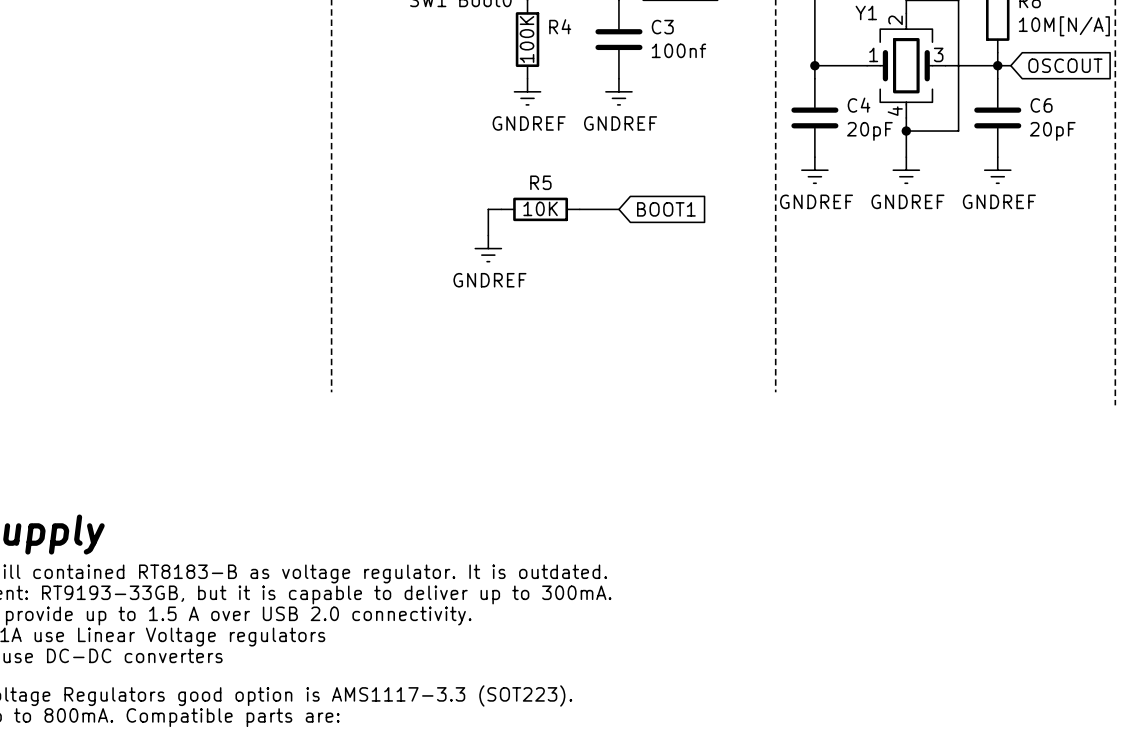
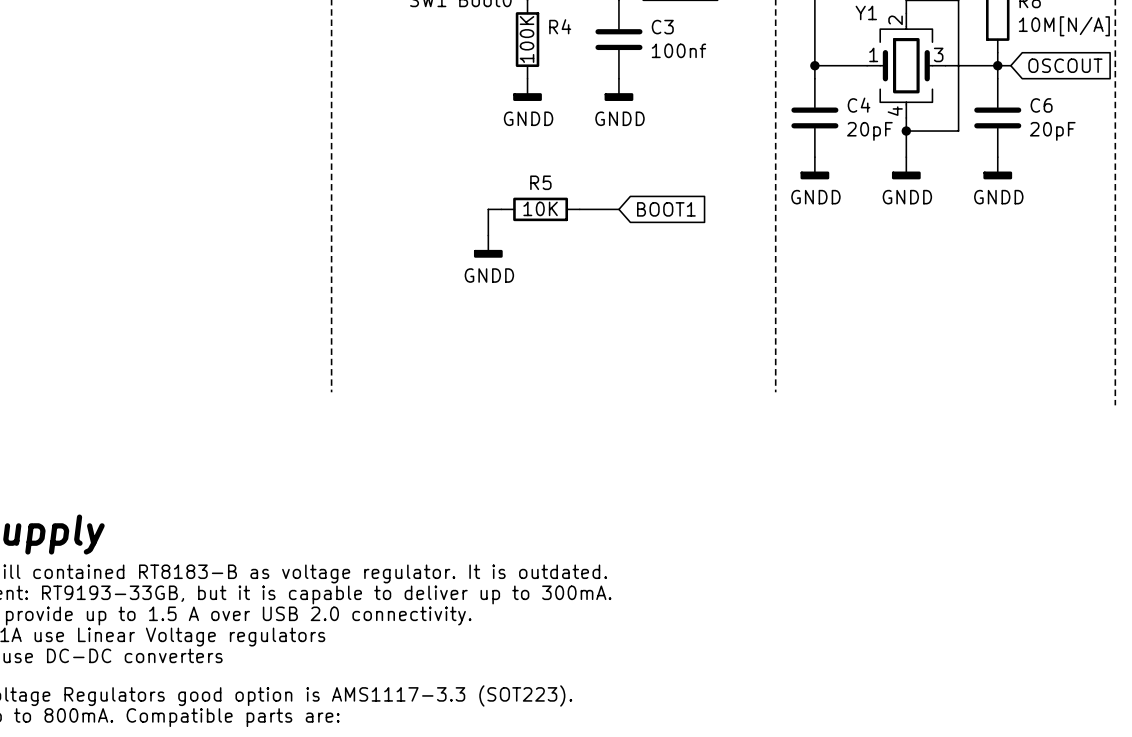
power symbol: GNDREF (527, 91) -> GNDD (527, 89)
power symbol: GNDREF (618, 91) -> GNDD (618, 89)
power symbol: GNDREF (814, 170) -> GNDD (814, 168)
power symbol: GNDREF (906, 170) -> GNDD (906, 168)
power symbol: GNDREF (997, 170) -> GNDD (997, 168)
power symbol: GNDREF (488, 248) -> GNDD (488, 246)

